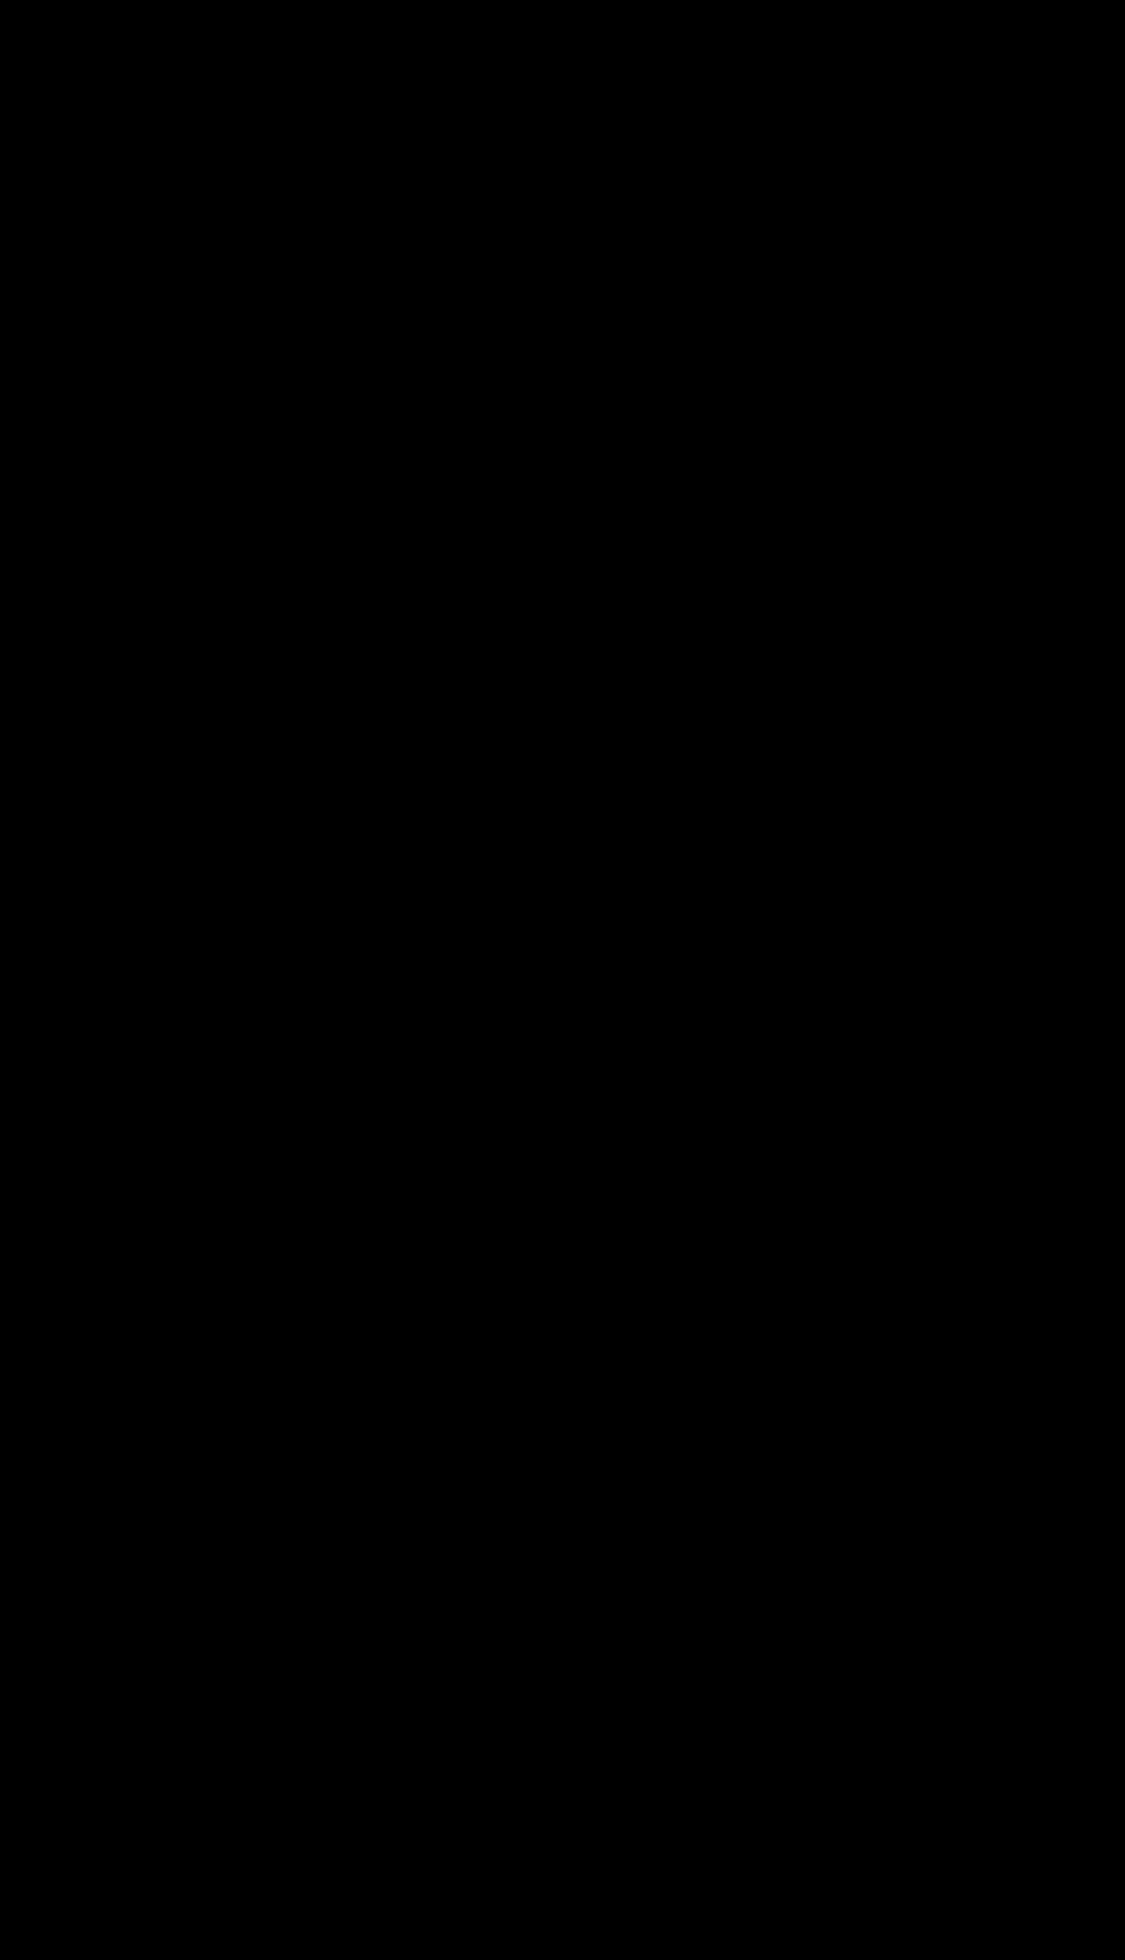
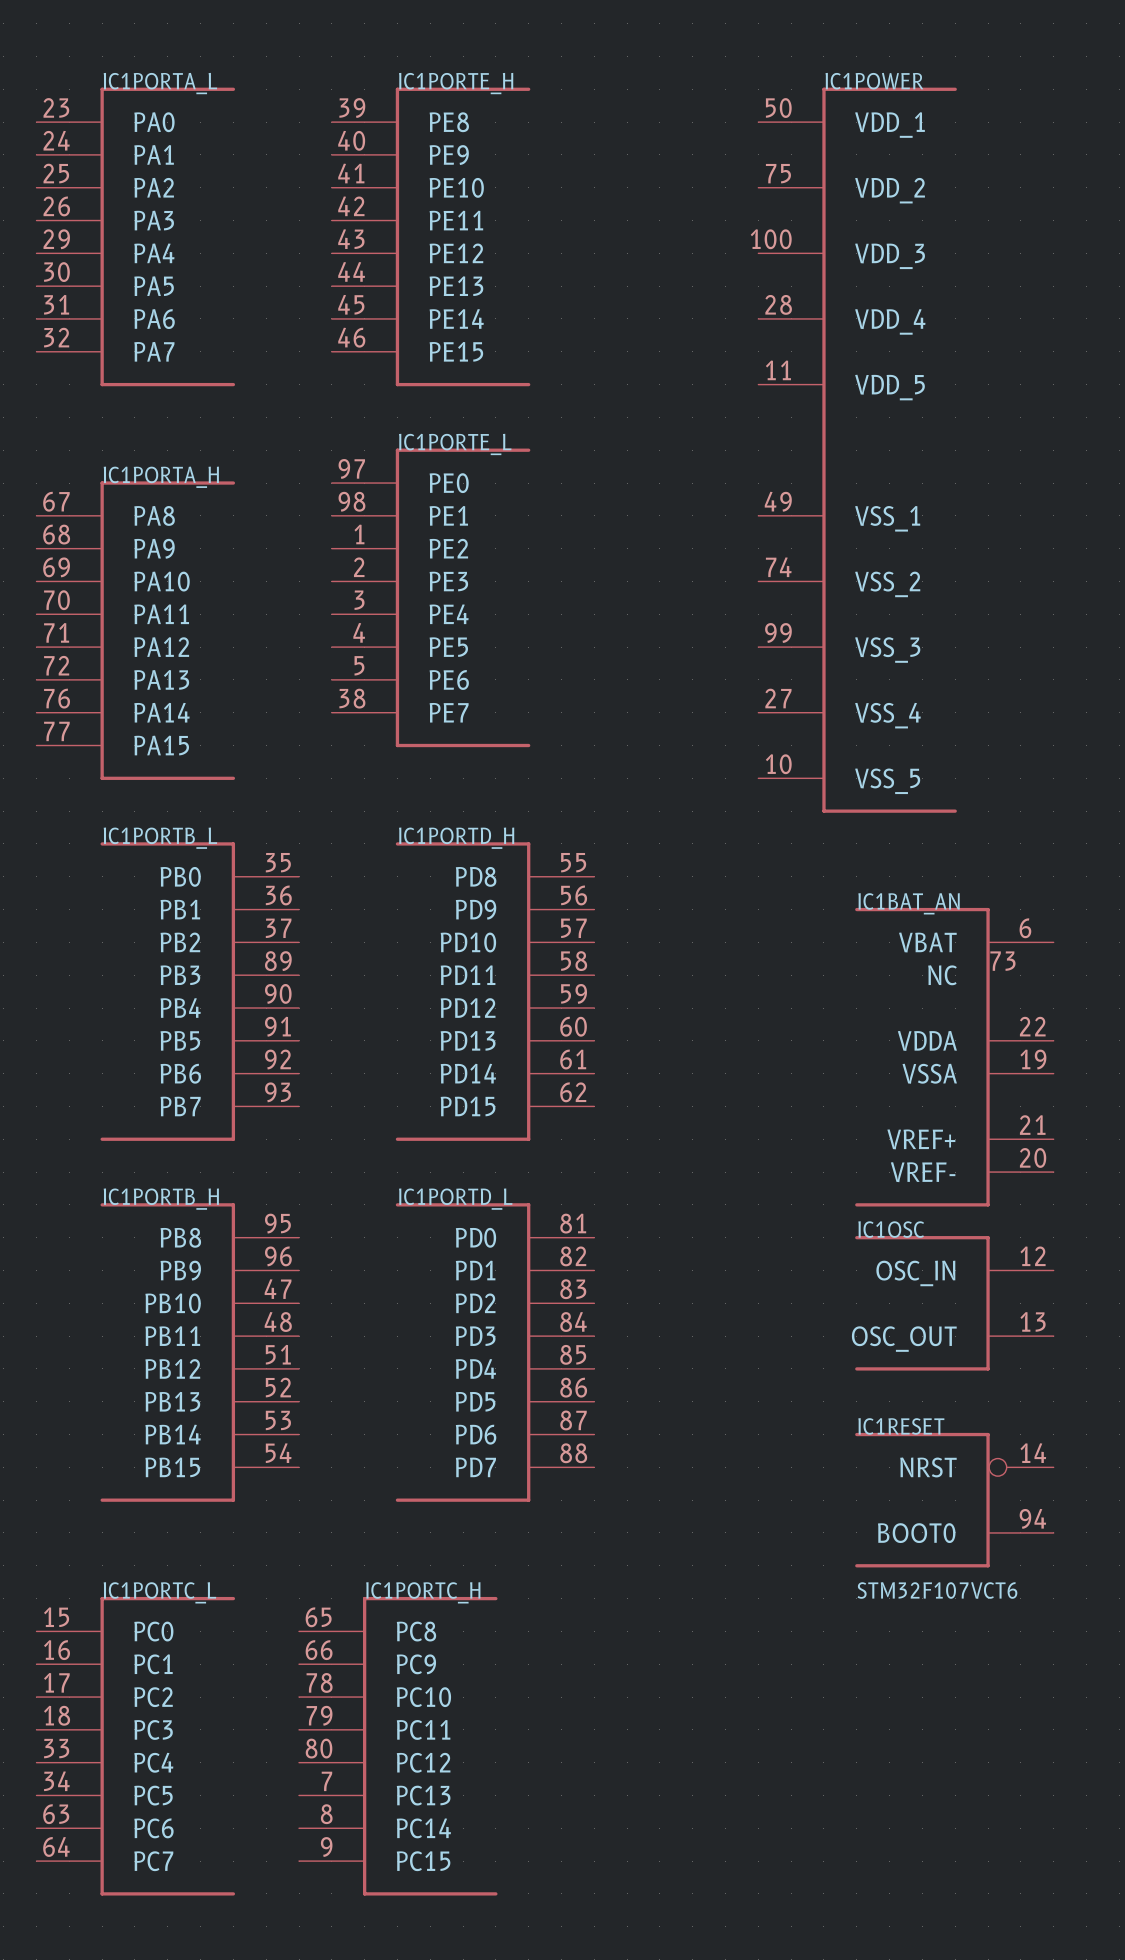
IC1PORTA_L: none -> (135, 236)
IC1PORTE_H: none -> (431, 236)
IC1POWER: none -> (857, 450)
IC1PORTE_L: none -> (431, 597)
IC1PORTA_H: none -> (135, 630)
IC1PORTB_L: none -> (199, 991)
IC1PORTD_H: none -> (495, 991)
IC1BAT_AN: none -> (954, 1057)
IC1OSC: none -> (954, 1303)
IC1PORTB_H: none -> (199, 1352)
IC1PORTD_L: none -> (495, 1352)
IC1RESET: none -> STM32F107VCT6 (954, 1500)
IC1PORTC_L: none -> (135, 1746)
IC1PORTC_H: none -> (398, 1746)

